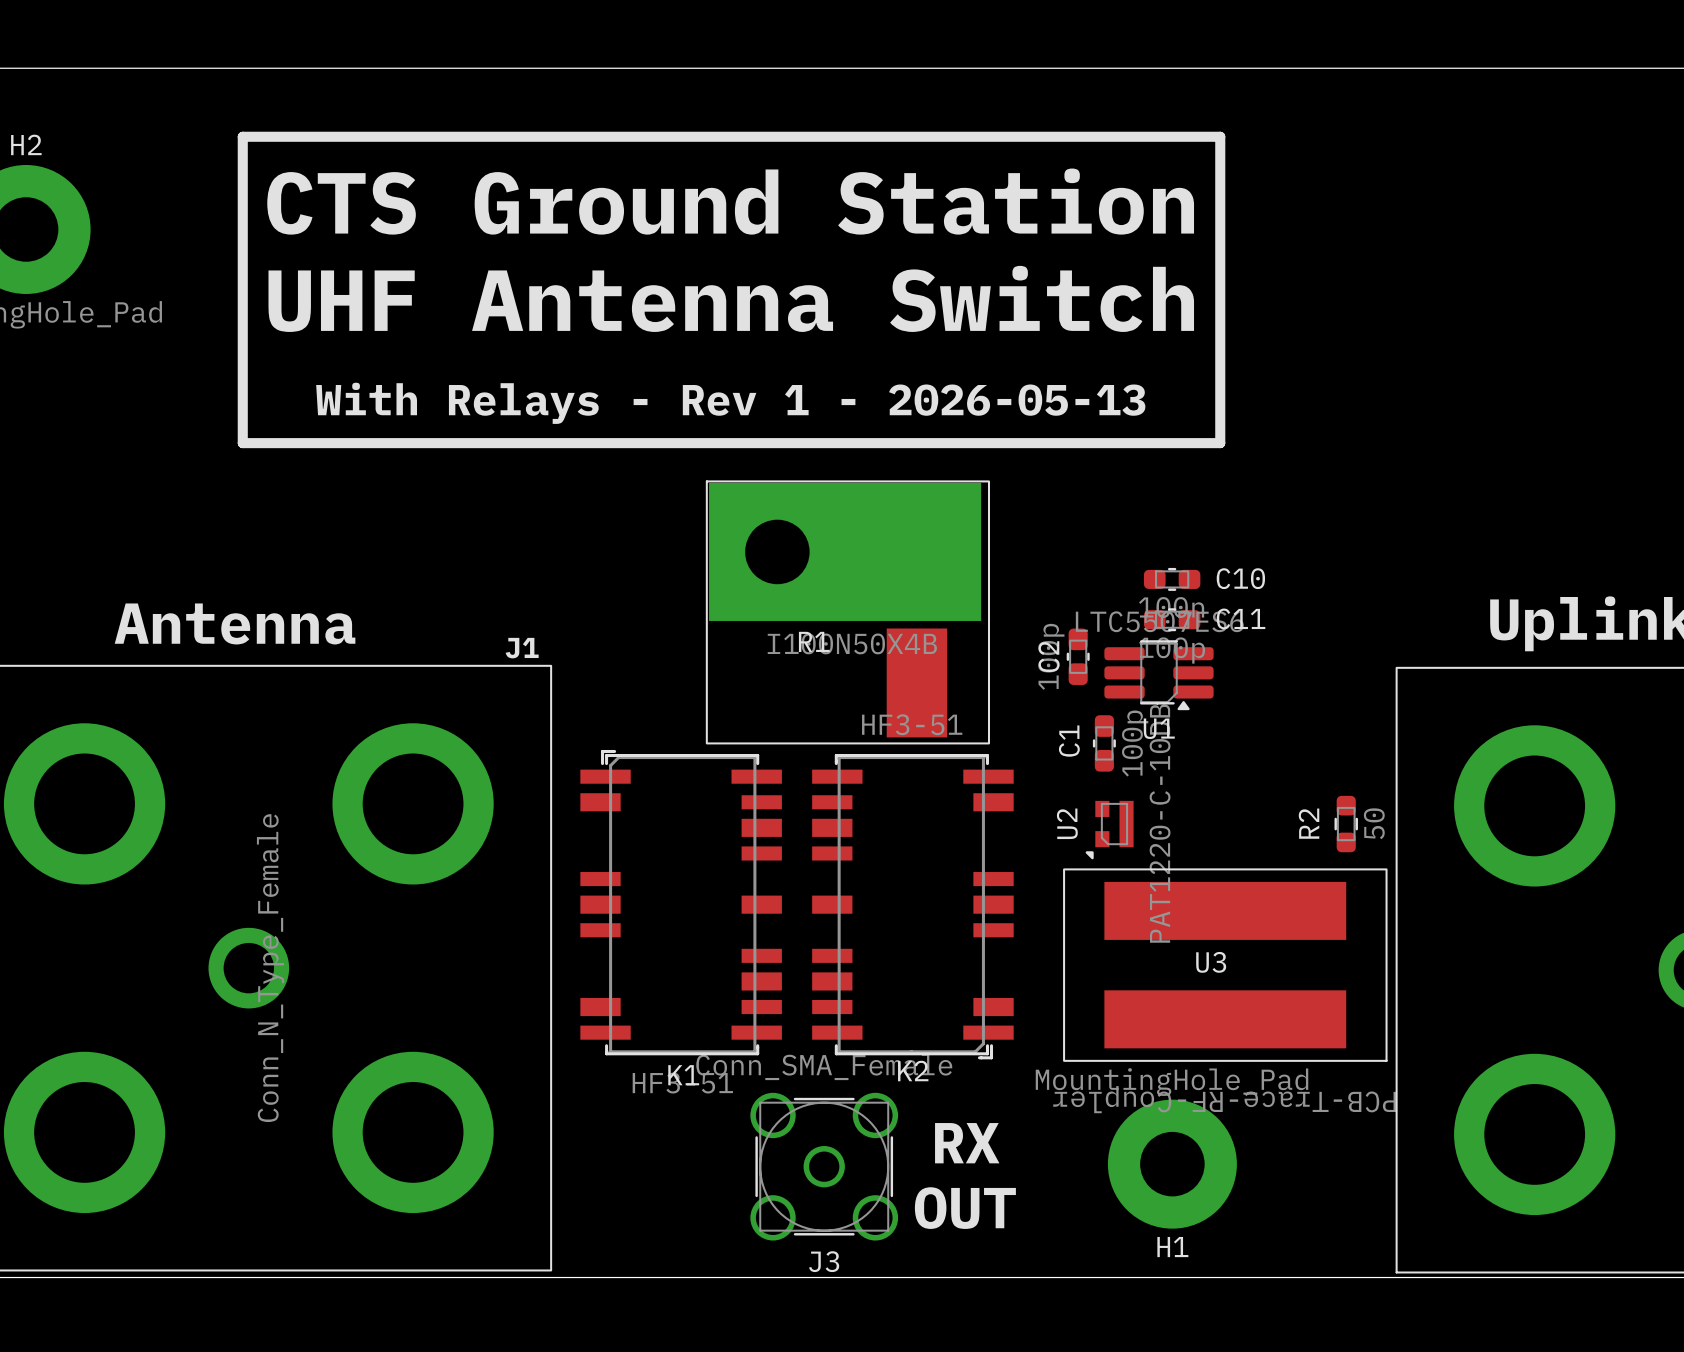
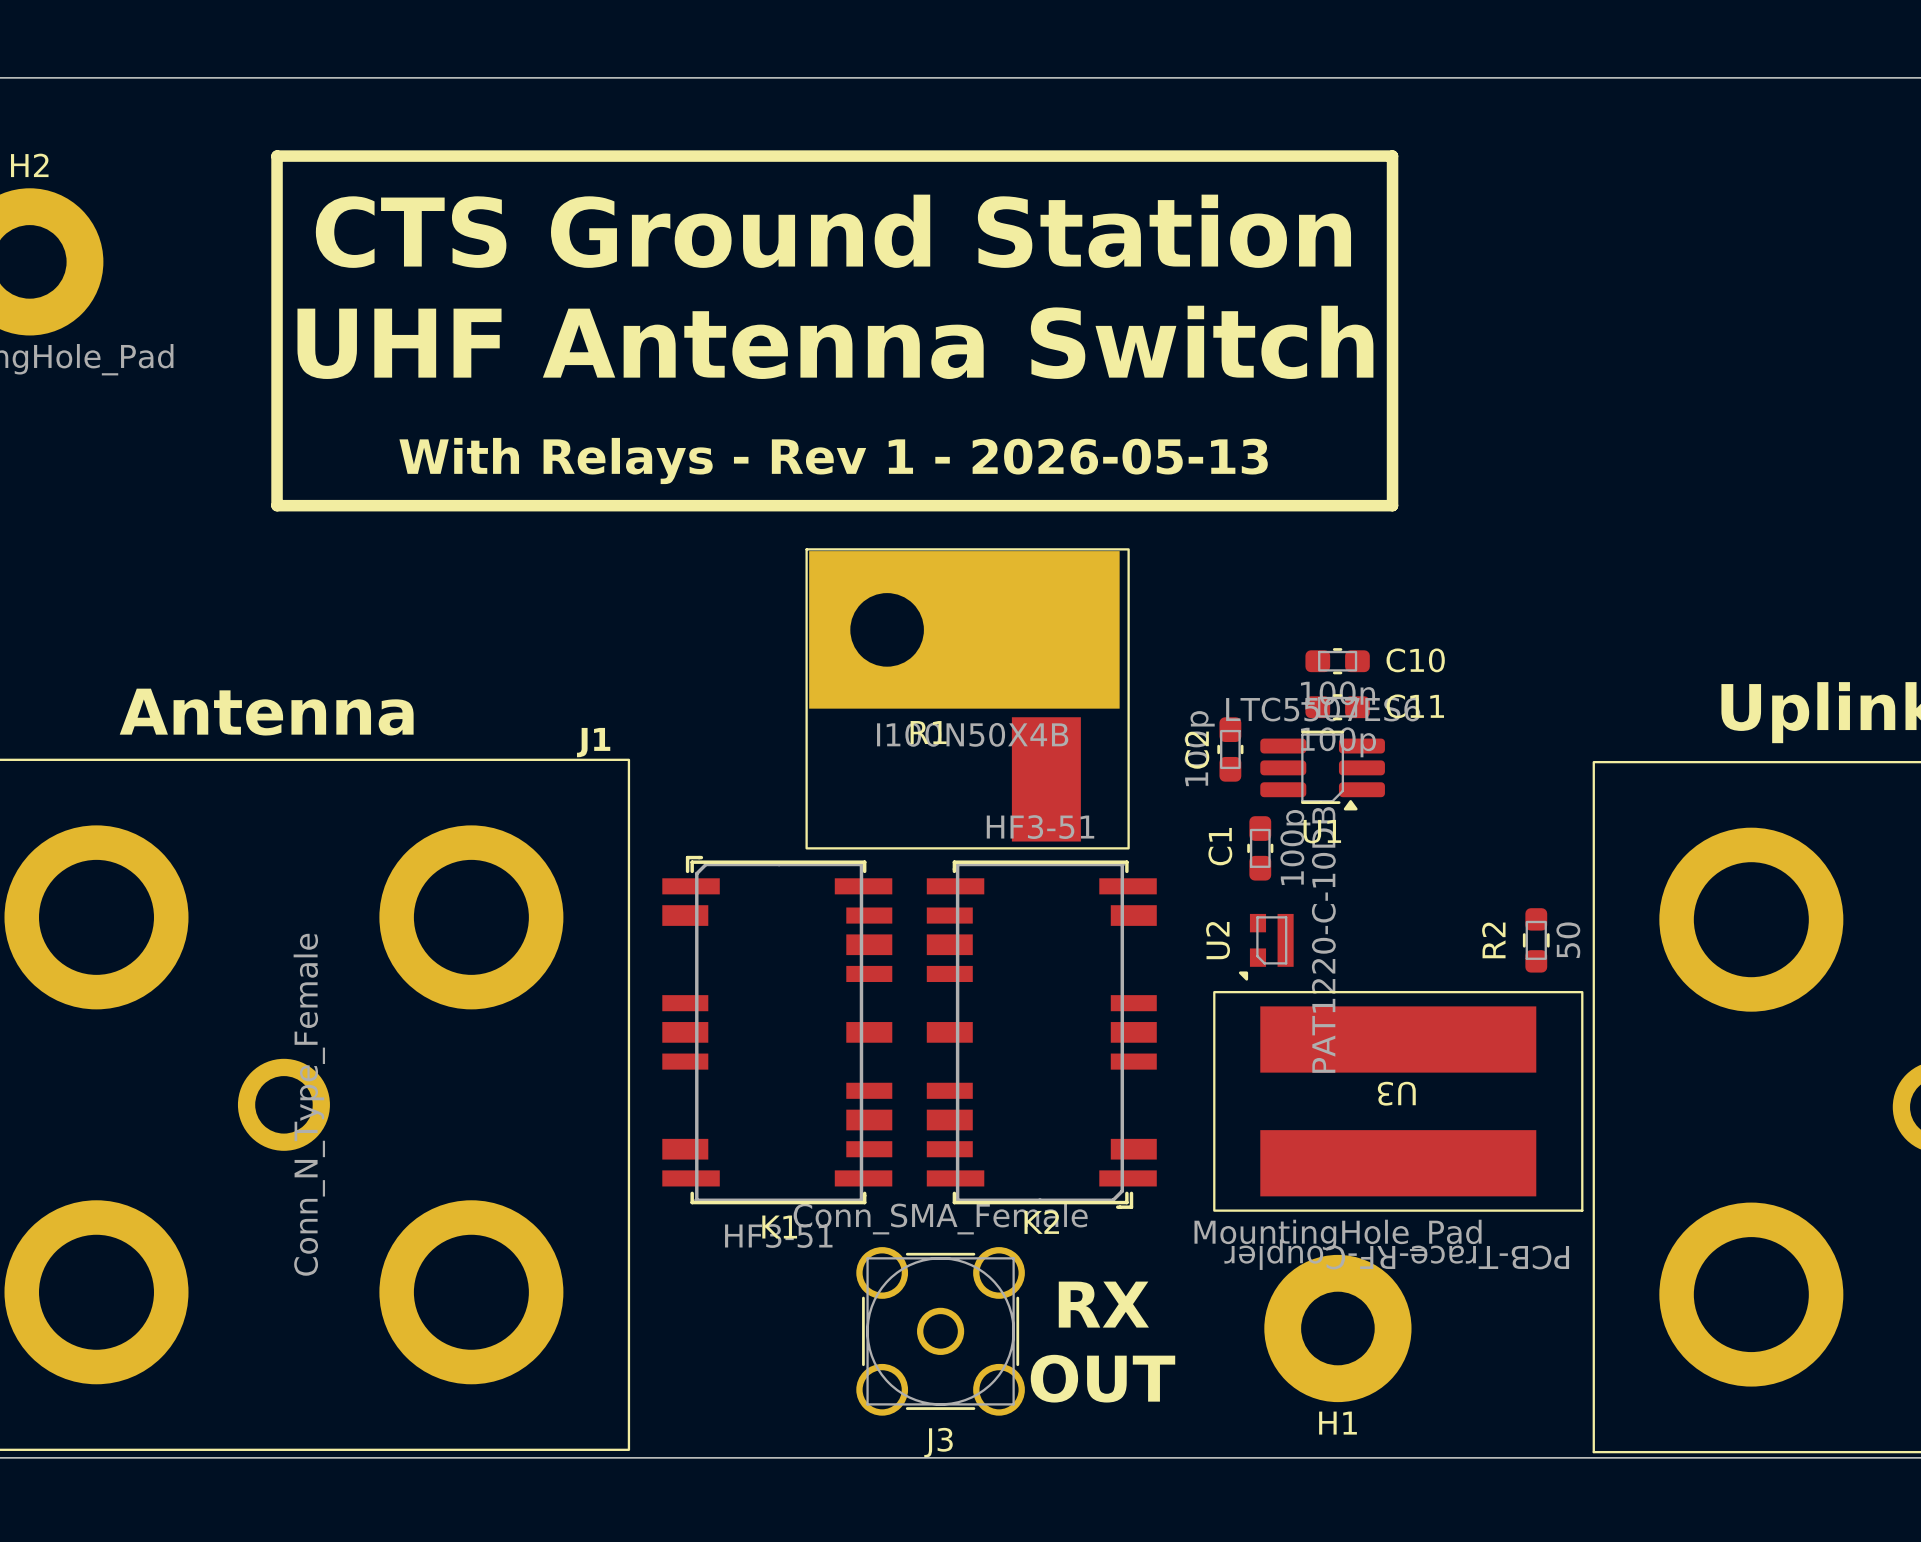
U3 name rotation: 0° (1211, 962) -> 180° (1396, 1093)

